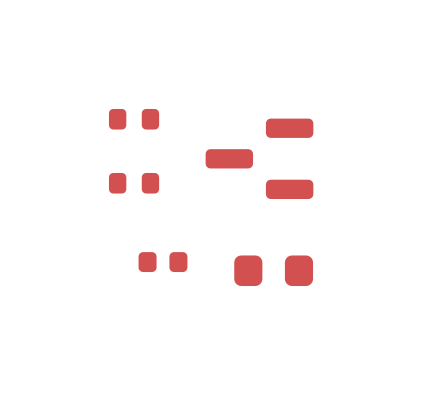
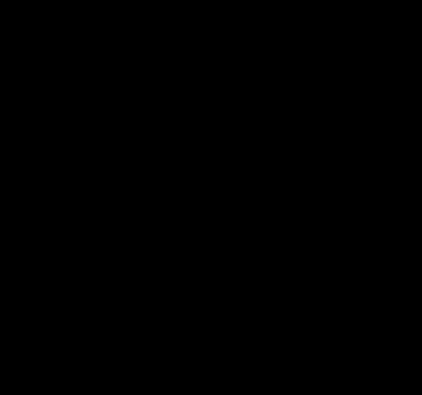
part: (134, 119) -> none
part: (259, 158) -> none
part: (134, 183) -> none
part: (162, 262) -> none
part: (273, 270) -> none

